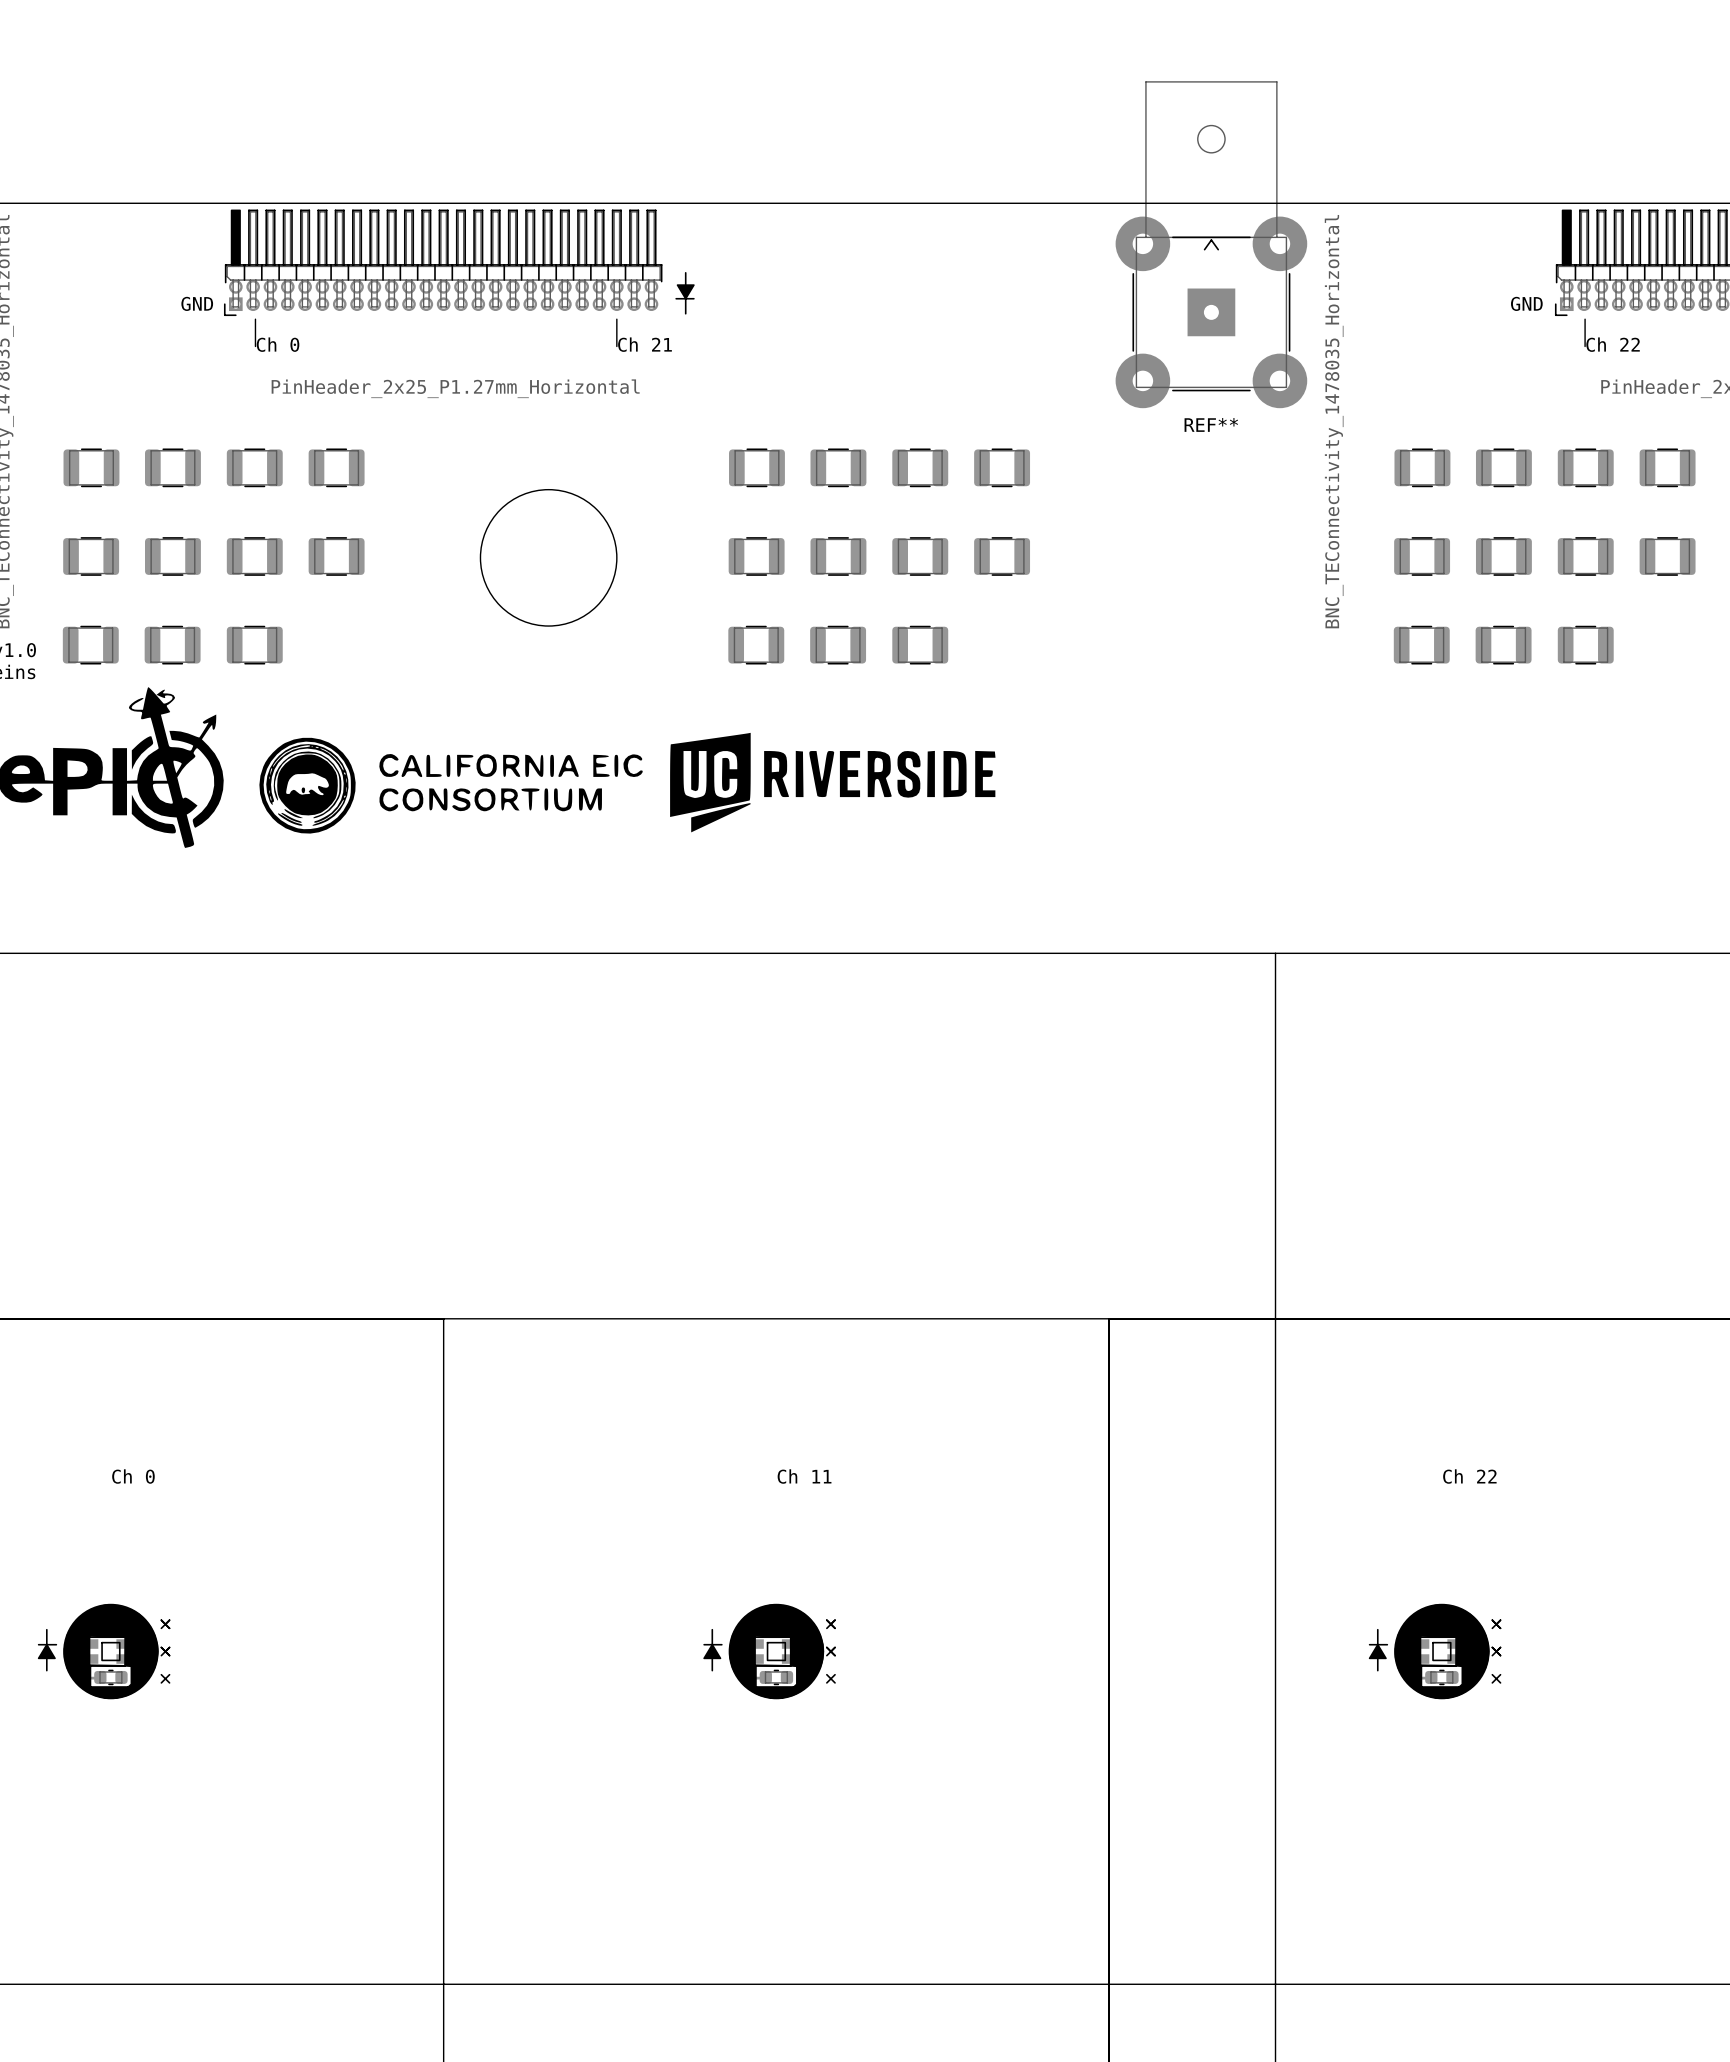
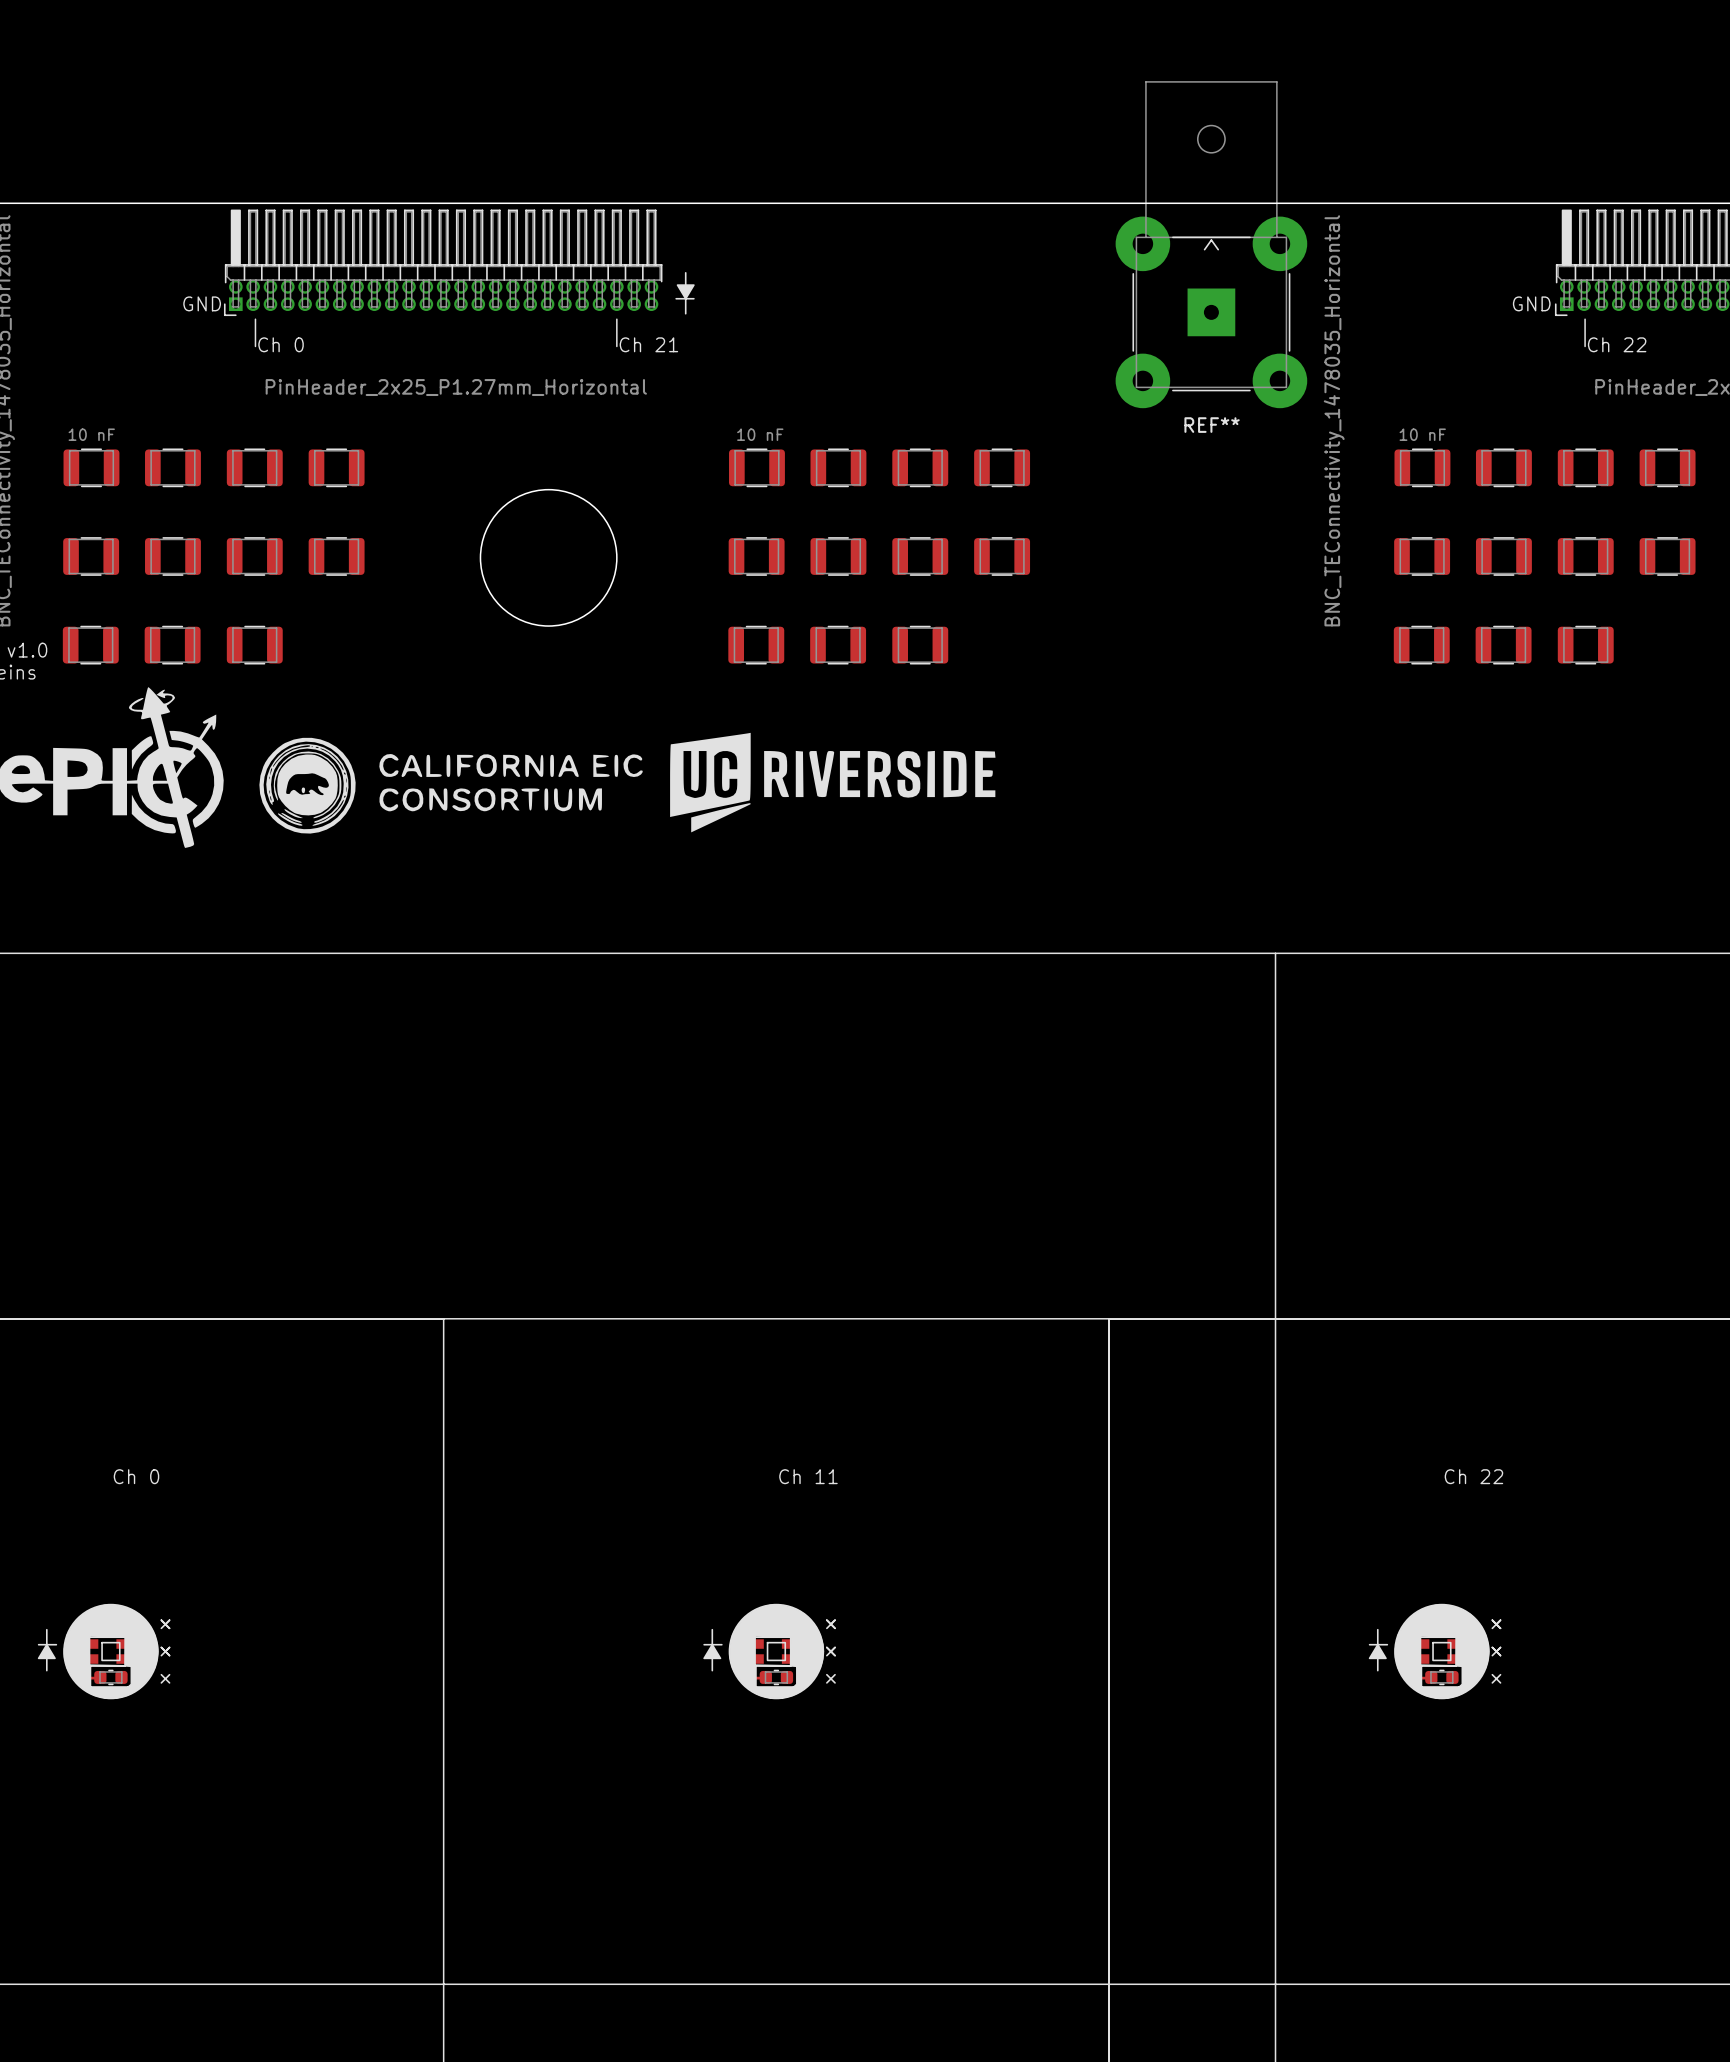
10 nF name: none -> 10 nF (91, 434)
text: none -> 10 nF (760, 434)
10 nF name: none -> 10 nF (1422, 434)

